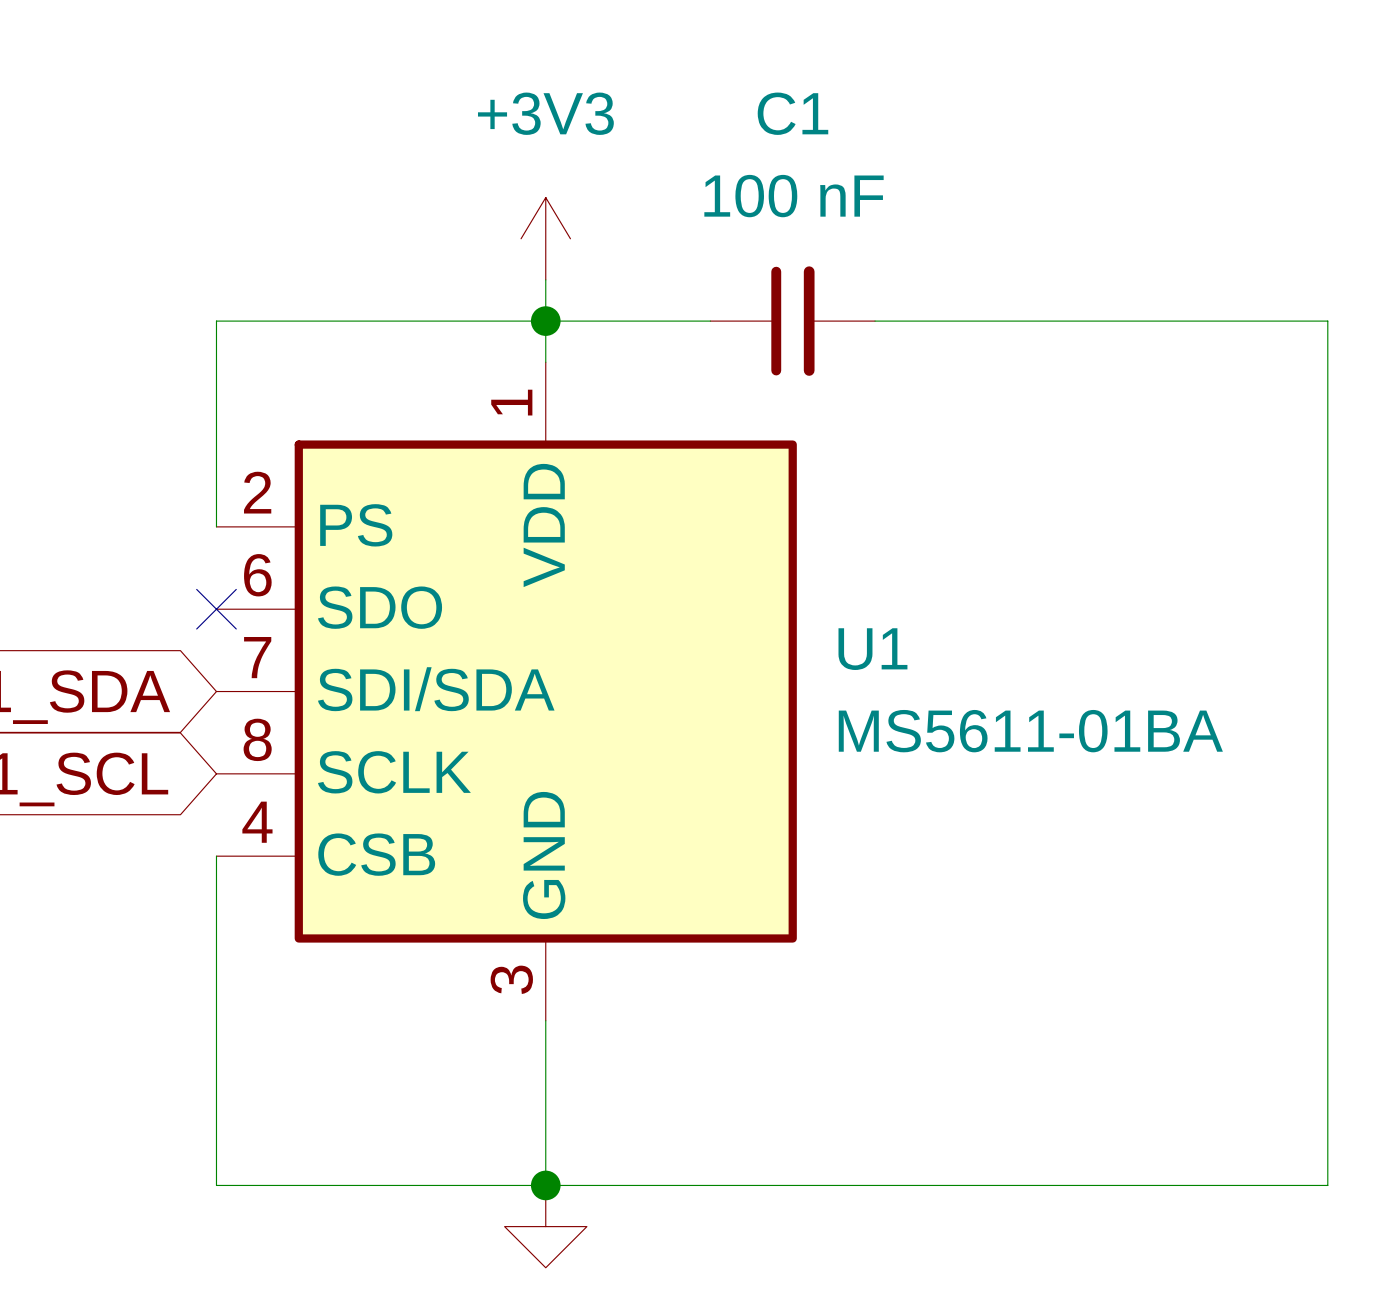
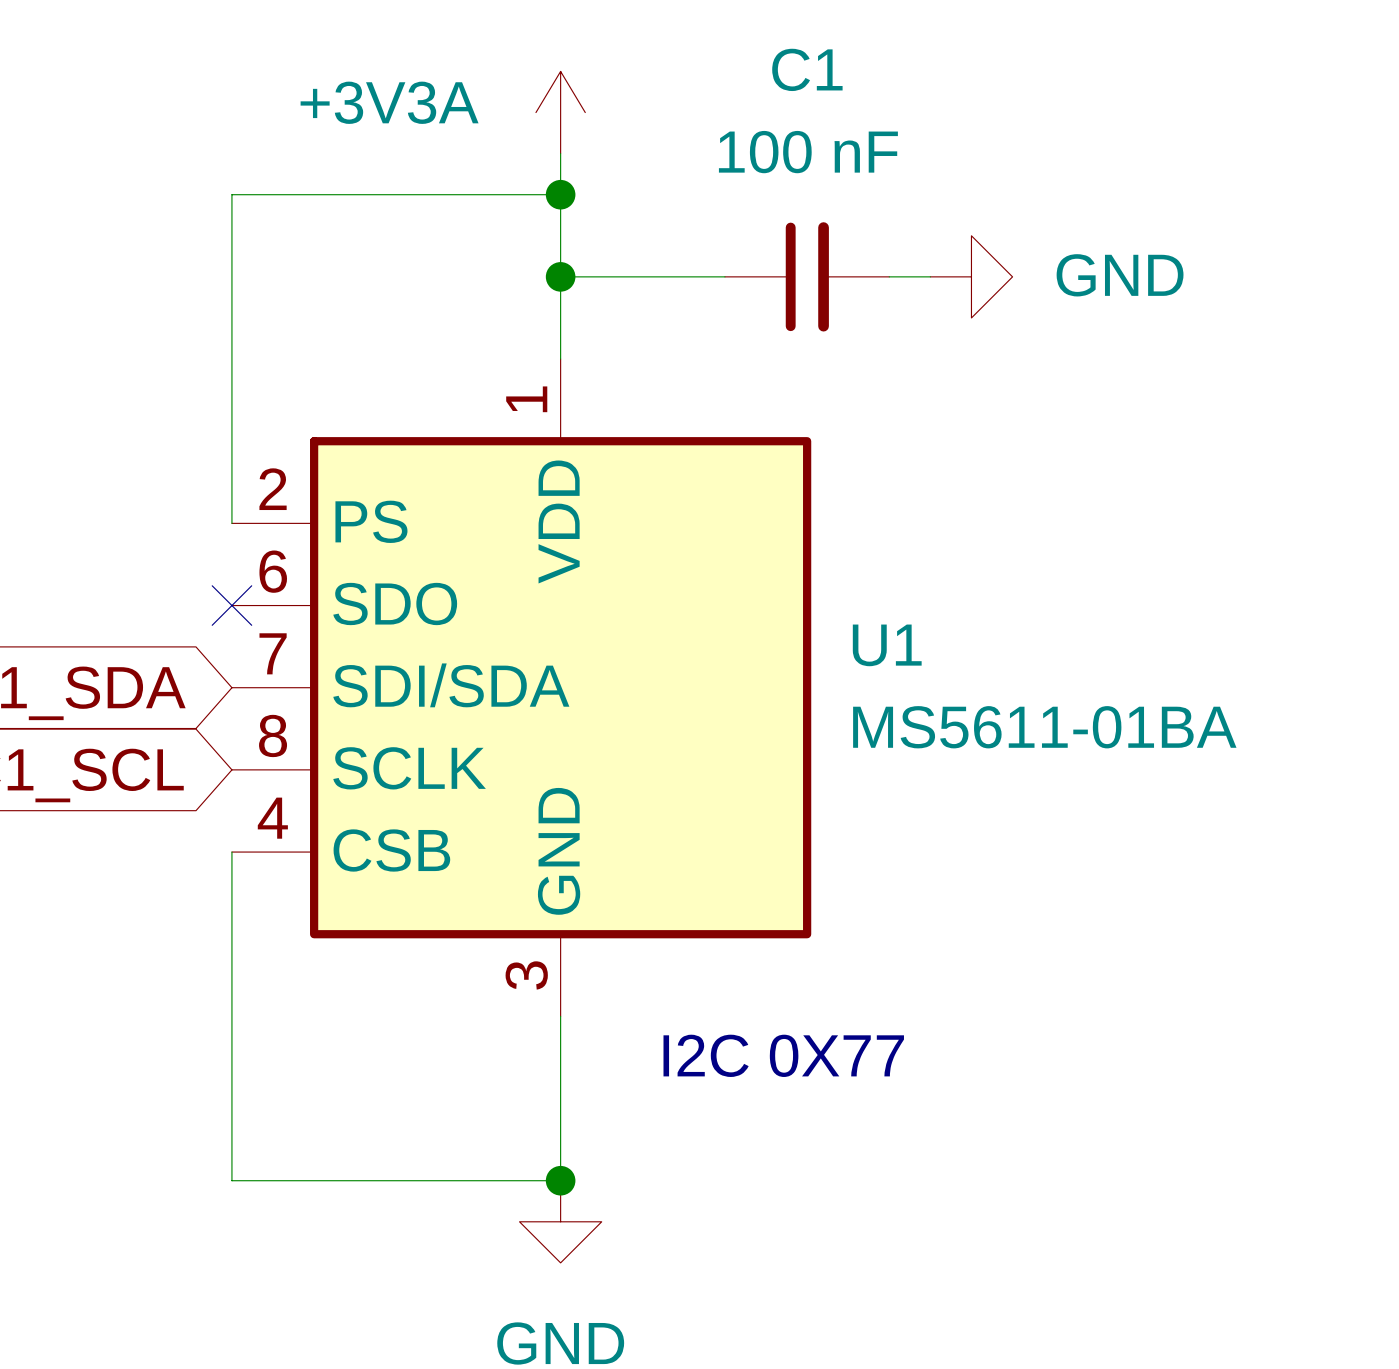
power symbol: none -> +3V3A (560, 112)
wire: none -> (560, 153) (560, 276) (724, 276)
junction: none -> (560, 194)
power symbol: +3V3 (545, 238) -> none
wire: none -> (889, 276) (930, 276)
power symbol: none -> GND (971, 276)
wire: (216, 321) (710, 321) -> (231, 317) (231, 194) (560, 194)
junction position: (545, 321) -> (560, 276)
C1 position: (792, 321) -> (807, 276)
wire: (875, 321) (1327, 321) (1327, 1185) (545, 1185) -> none
text: none -> I2C 0X77 (783, 1055)

